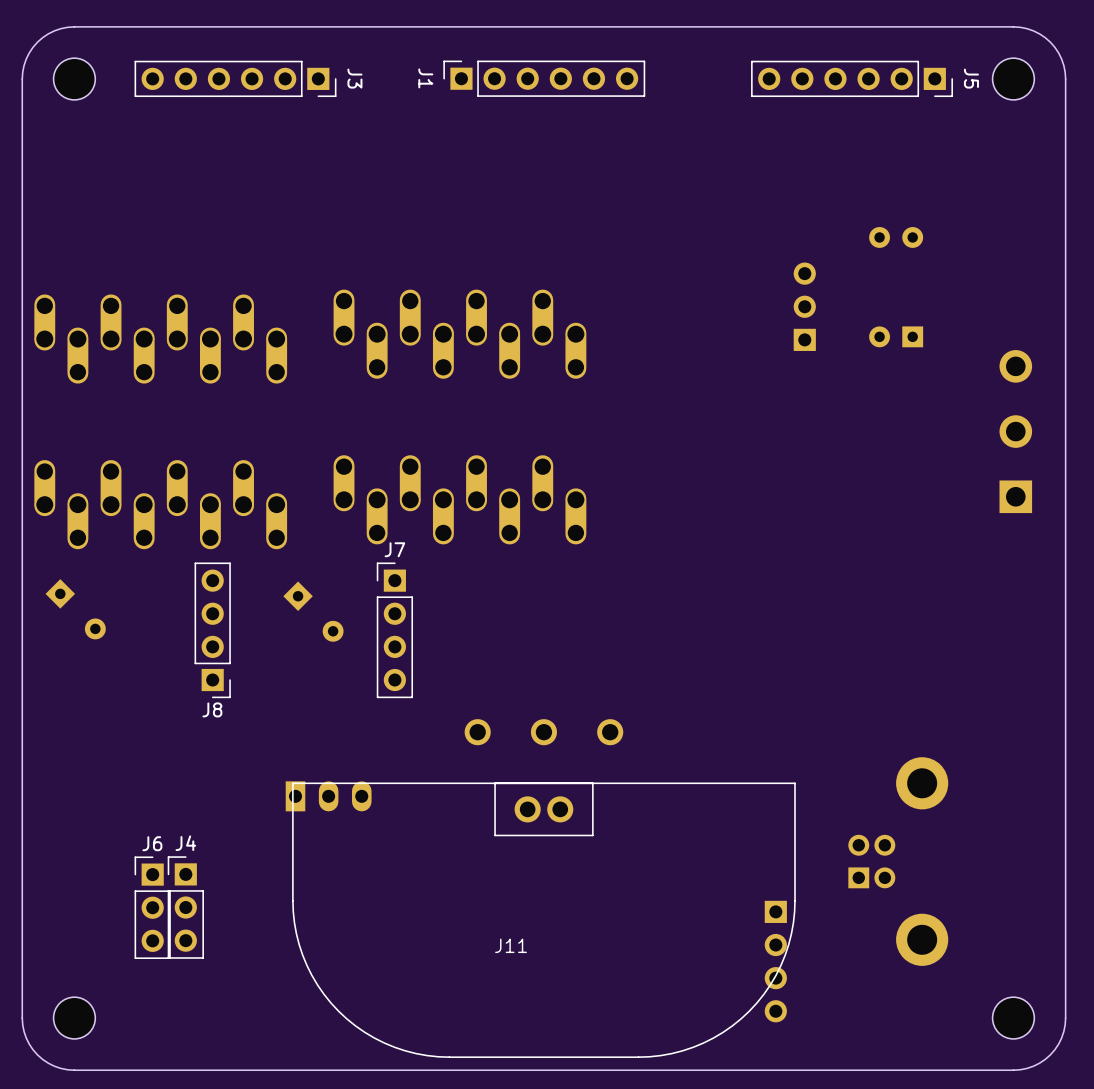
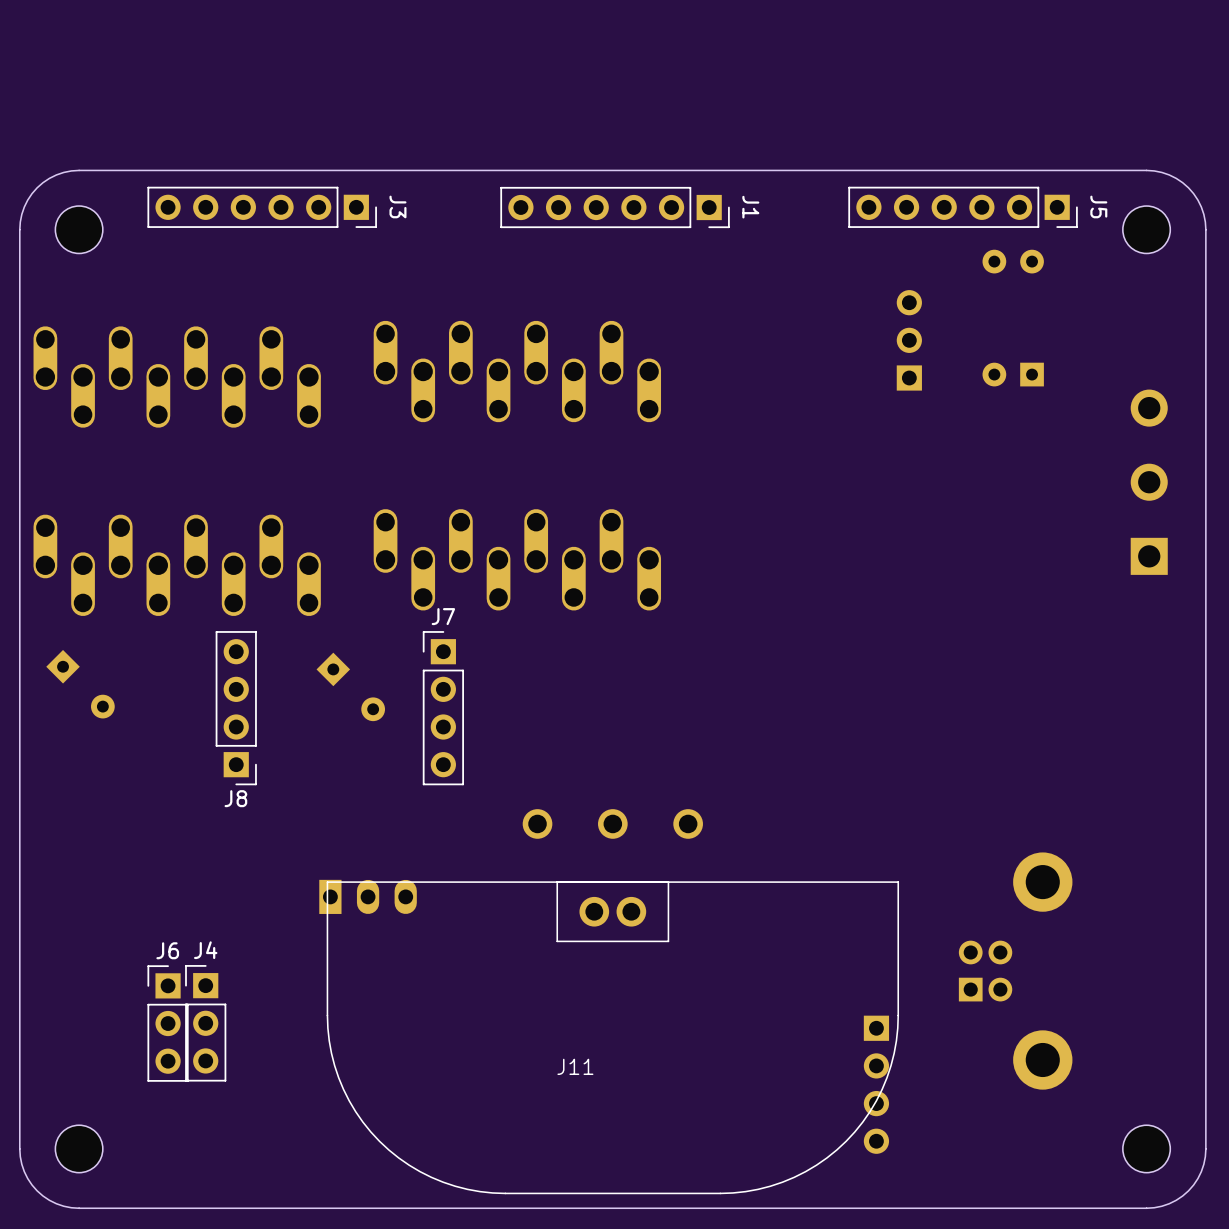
J3 position: (235, 78) -> (262, 207)
J1 rotation: 0° (544, 78) -> 180° (615, 207)
J5 position: (852, 78) -> (963, 207)
part position: (74, 79) -> (79, 229)
part position: (1013, 79) -> (1146, 229)
board edge: (1065, 209) (1065, 79) (1063, 65) (1058, 52) (1045, 37) (1026, 28) (1013, 26) (67, 27) (54, 30) (42, 37) (33, 47) (24, 65) (22, 79) (22, 209) -> (1205, 229) (1201, 207) (1188, 187) (1169, 174) (1146, 170) (79, 170) (56, 174) (37, 187) (24, 207) (19, 229)

